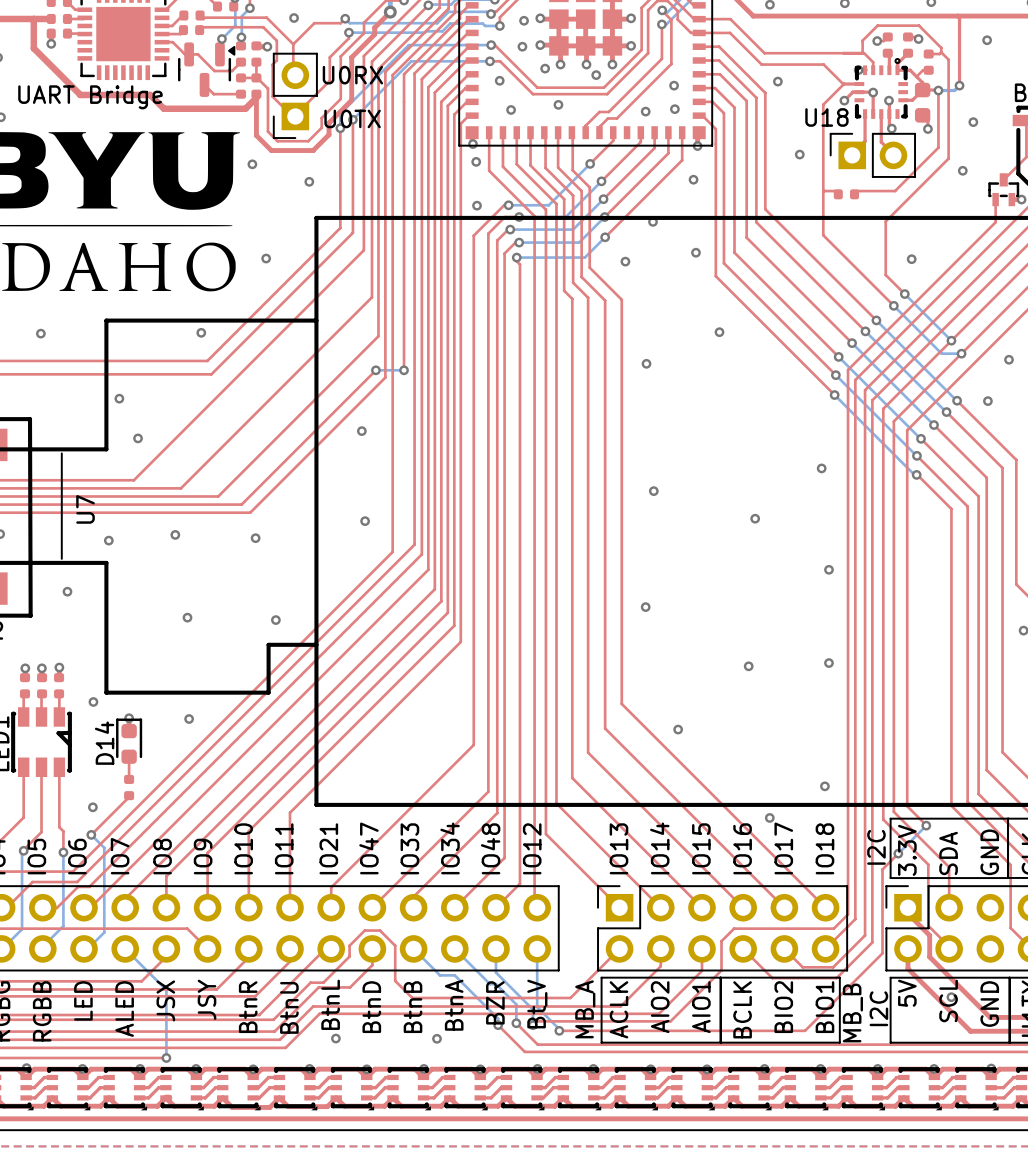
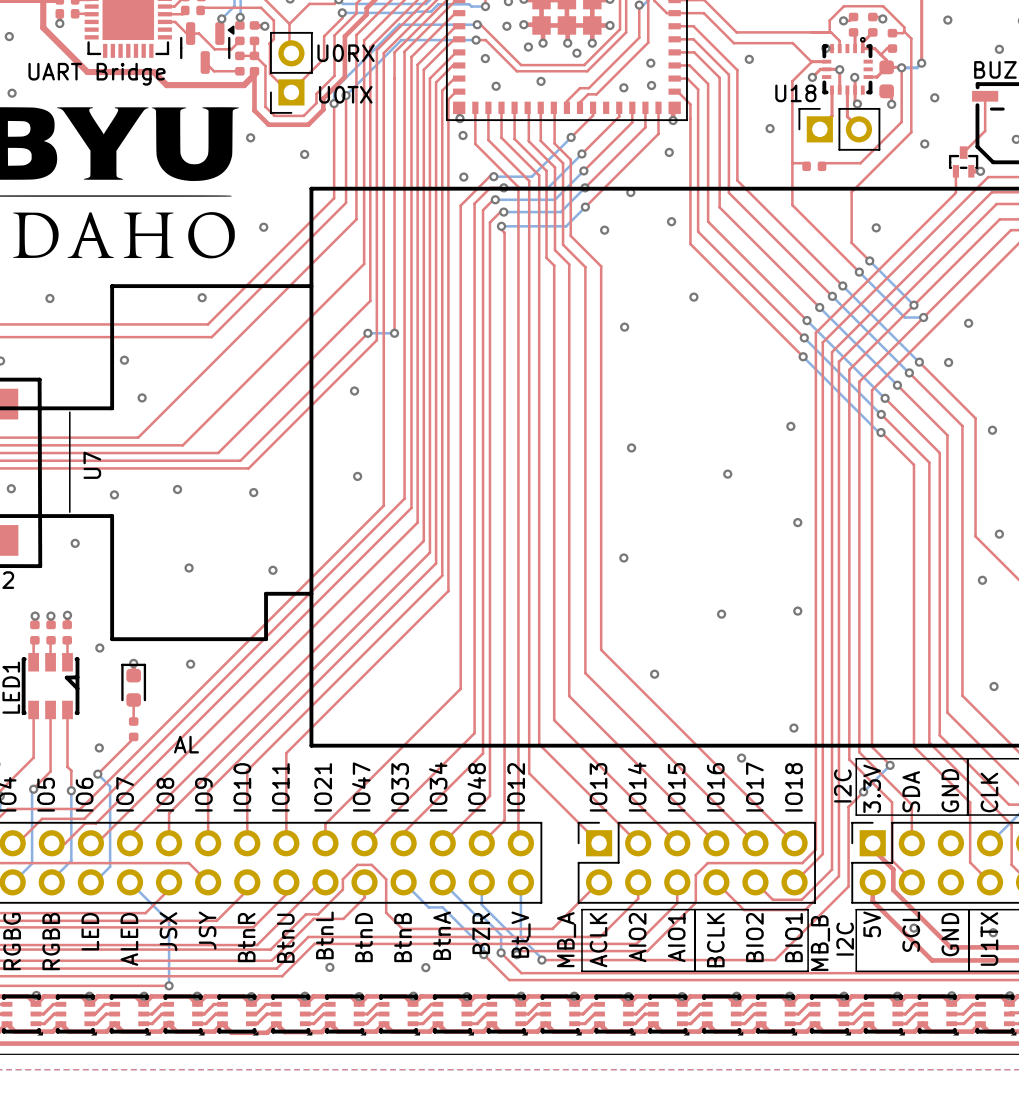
D14 name: D14 (104, 743) -> none
text: none -> AL (186, 744)

